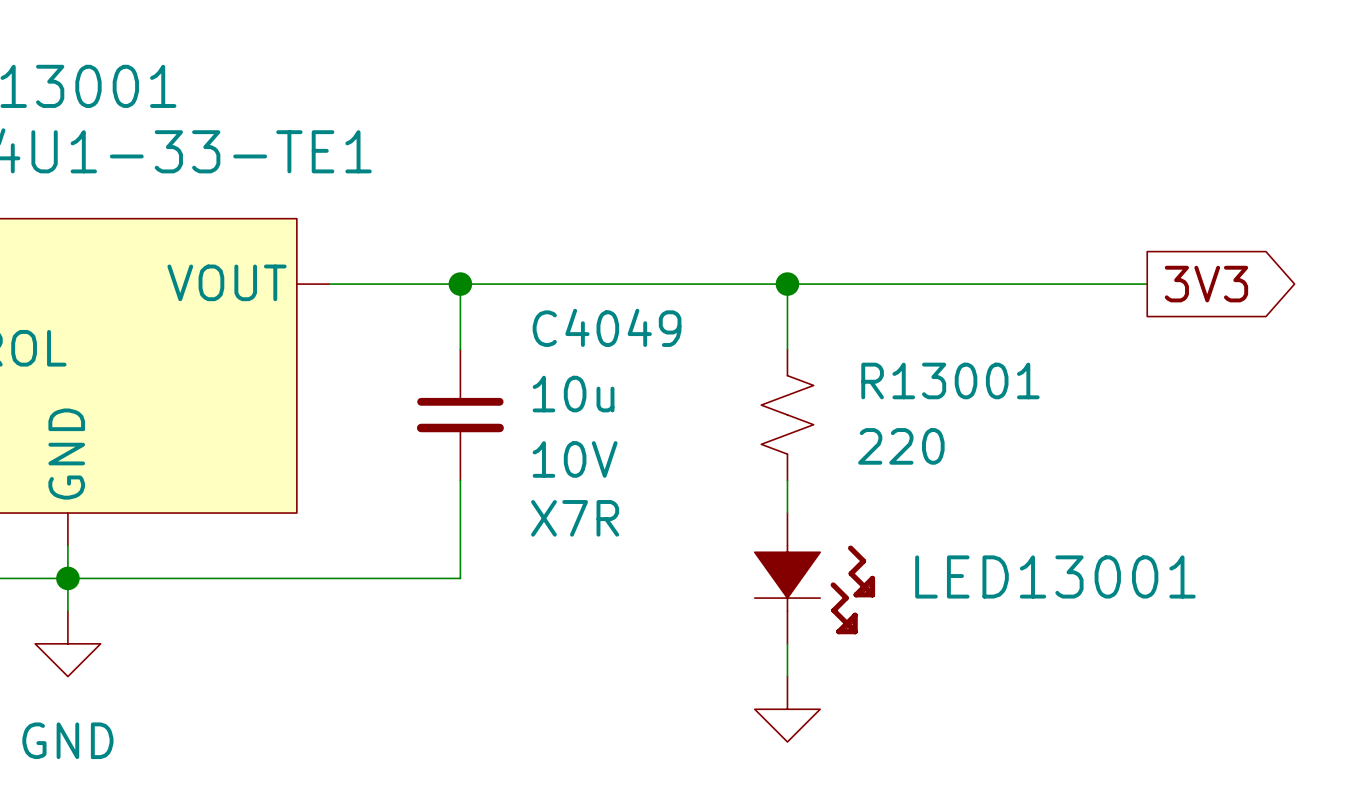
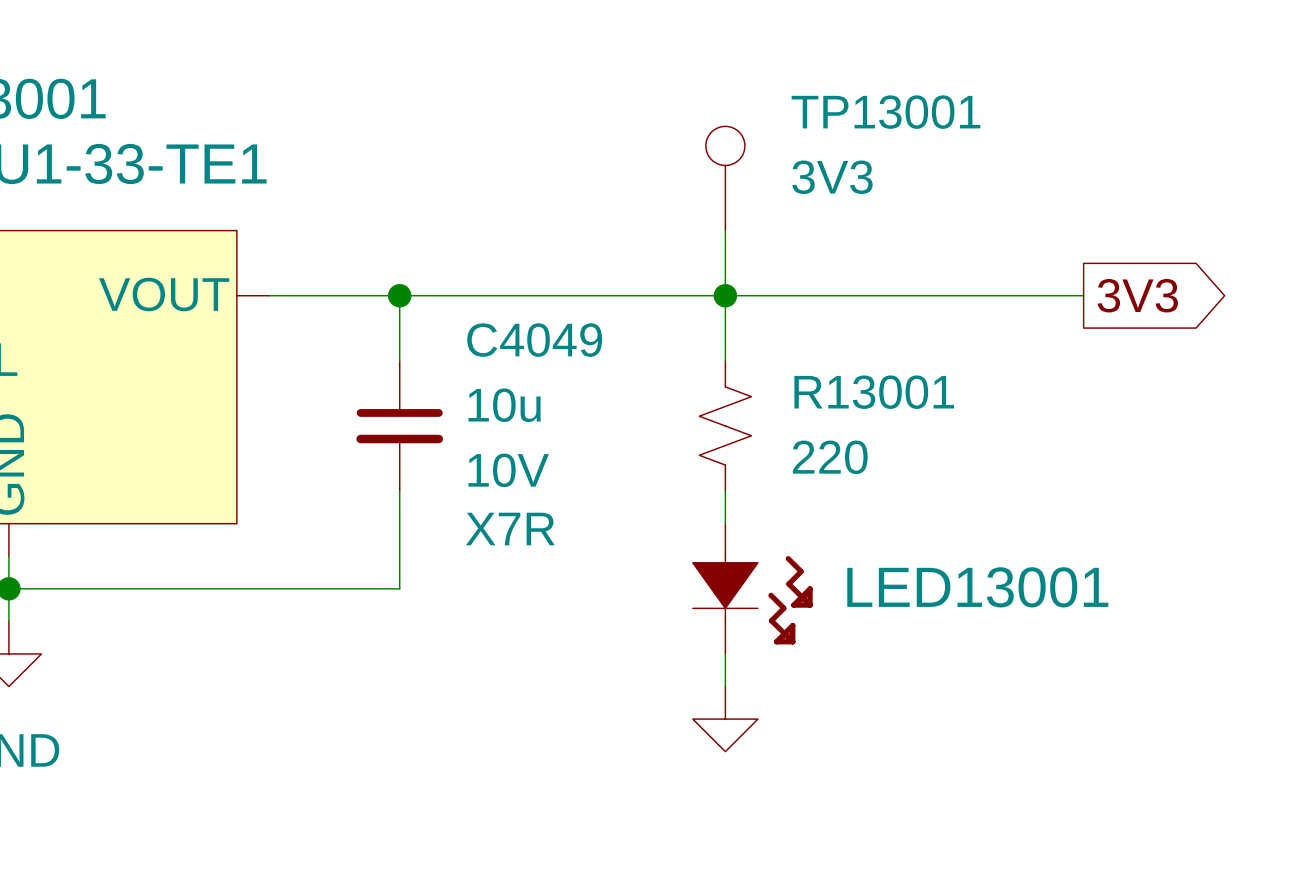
TP13001: none -> 3V3 (725, 178)
wire: none -> (725, 230) (725, 295)

